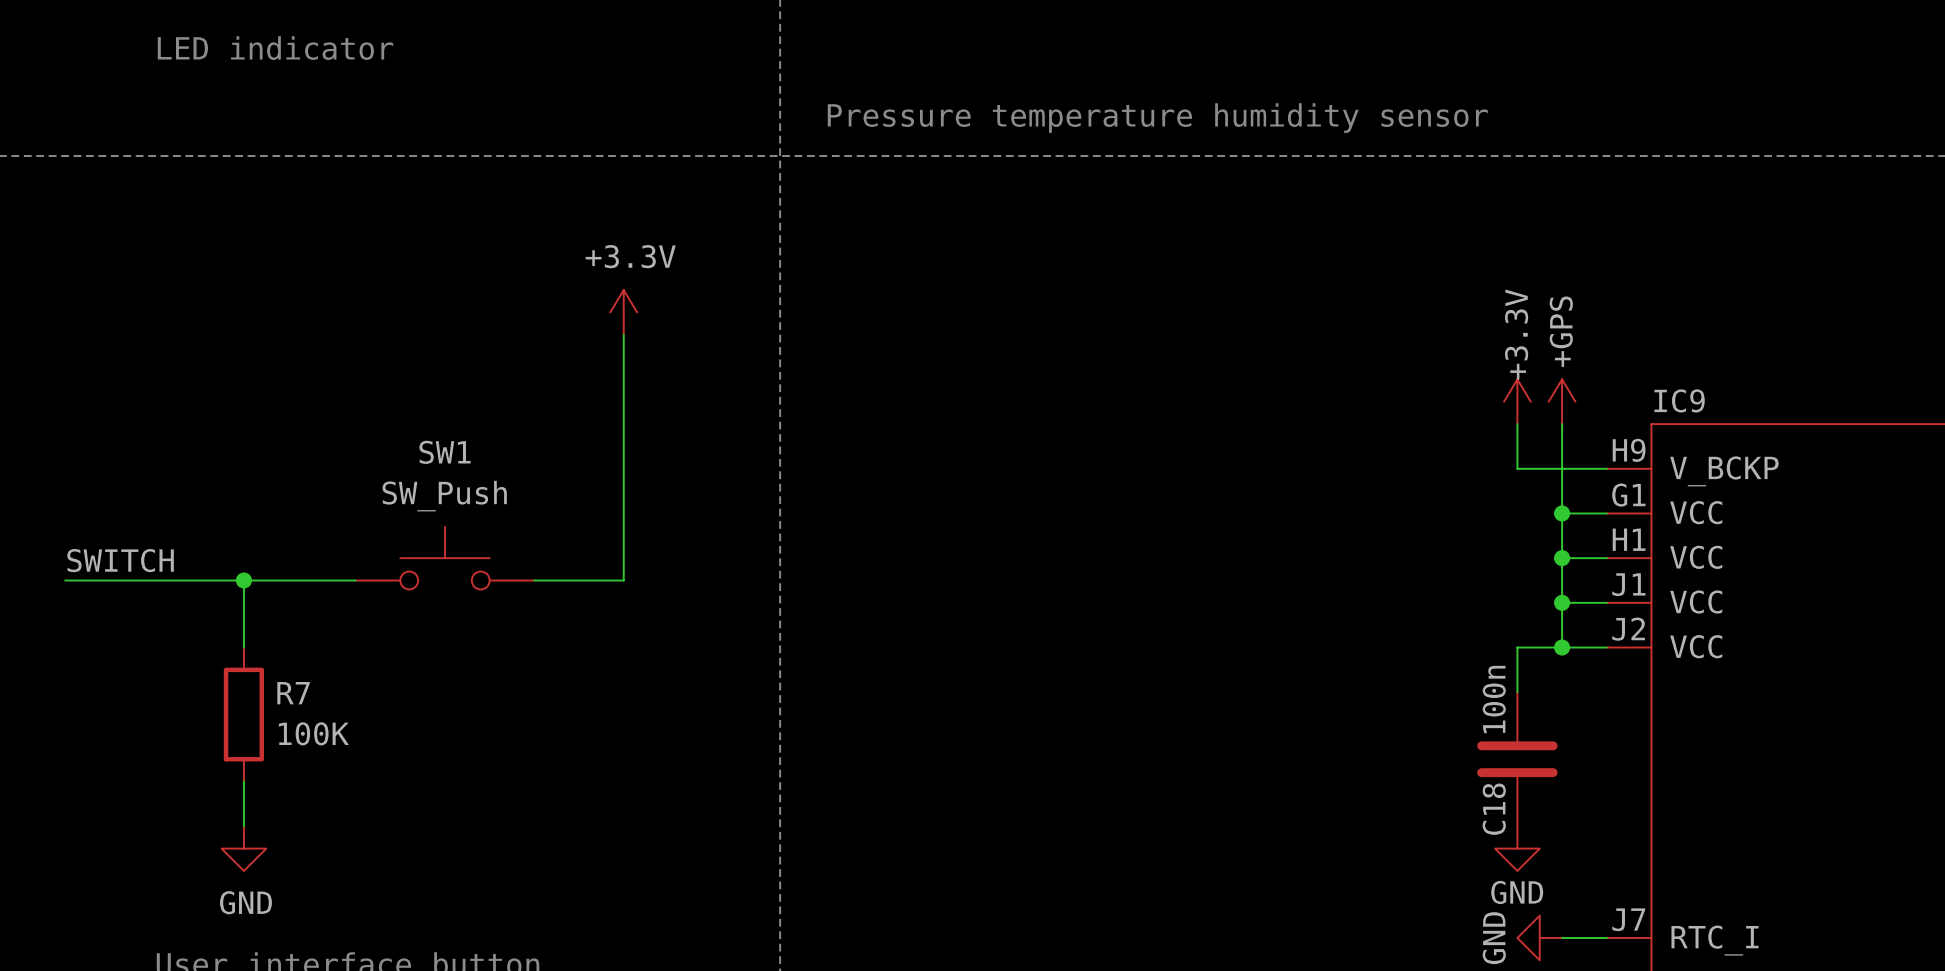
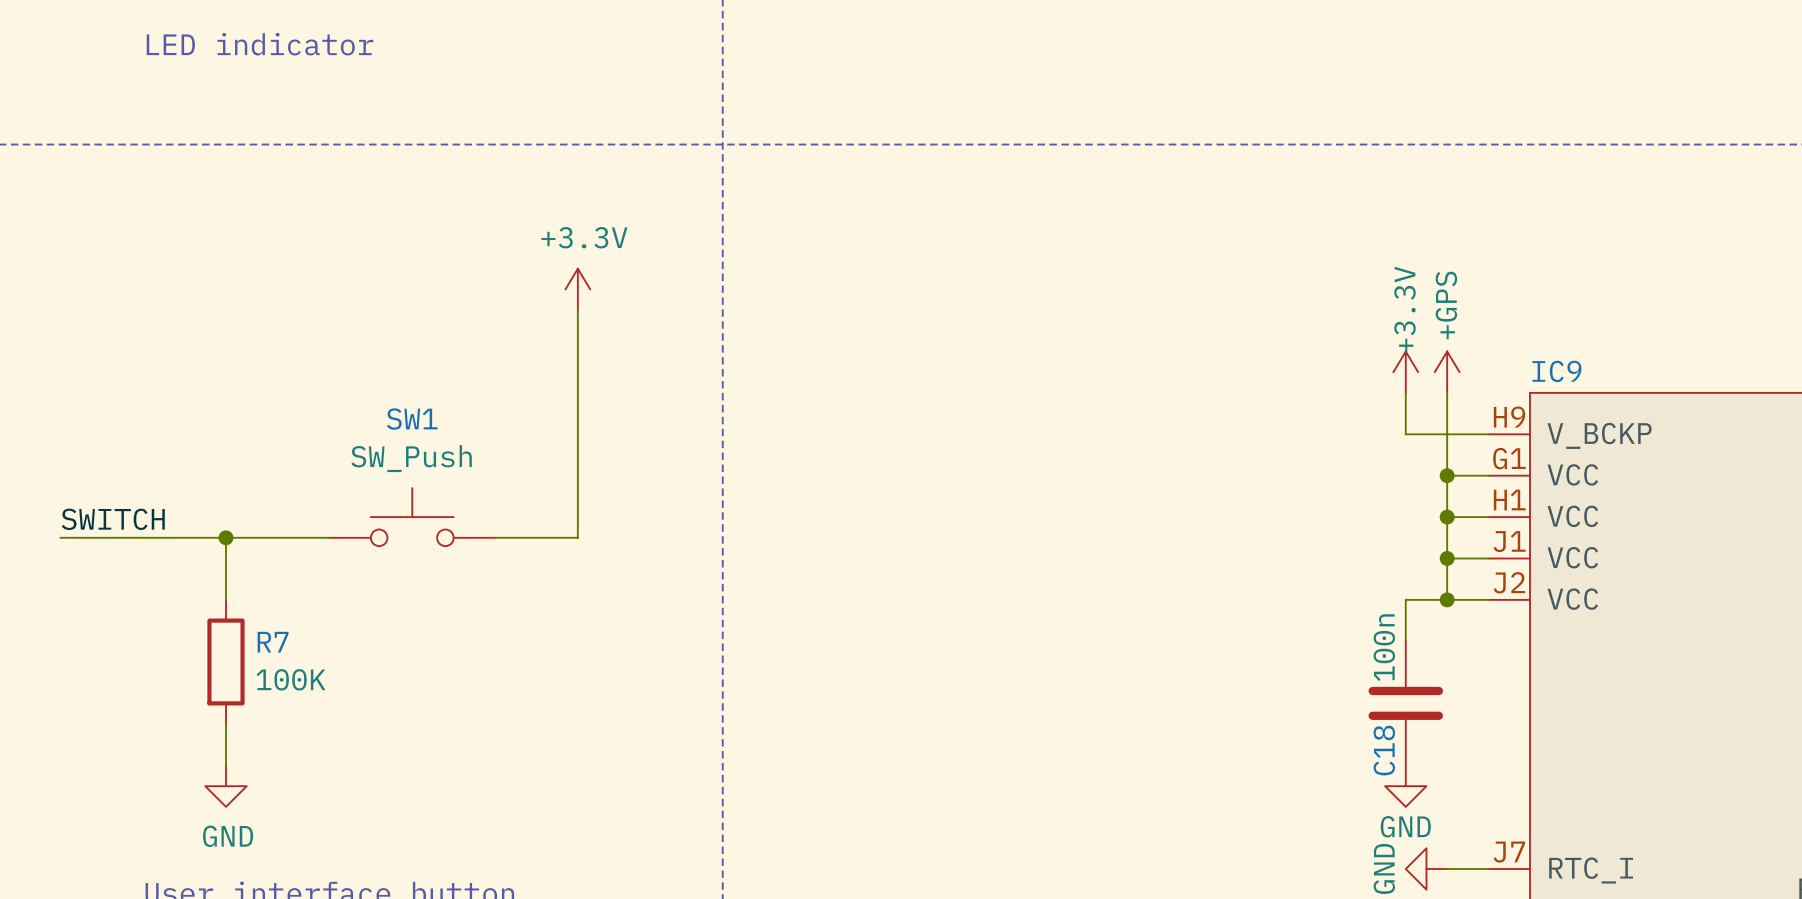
text: Pressure temperature humidity sensor (1157, 118) -> none

